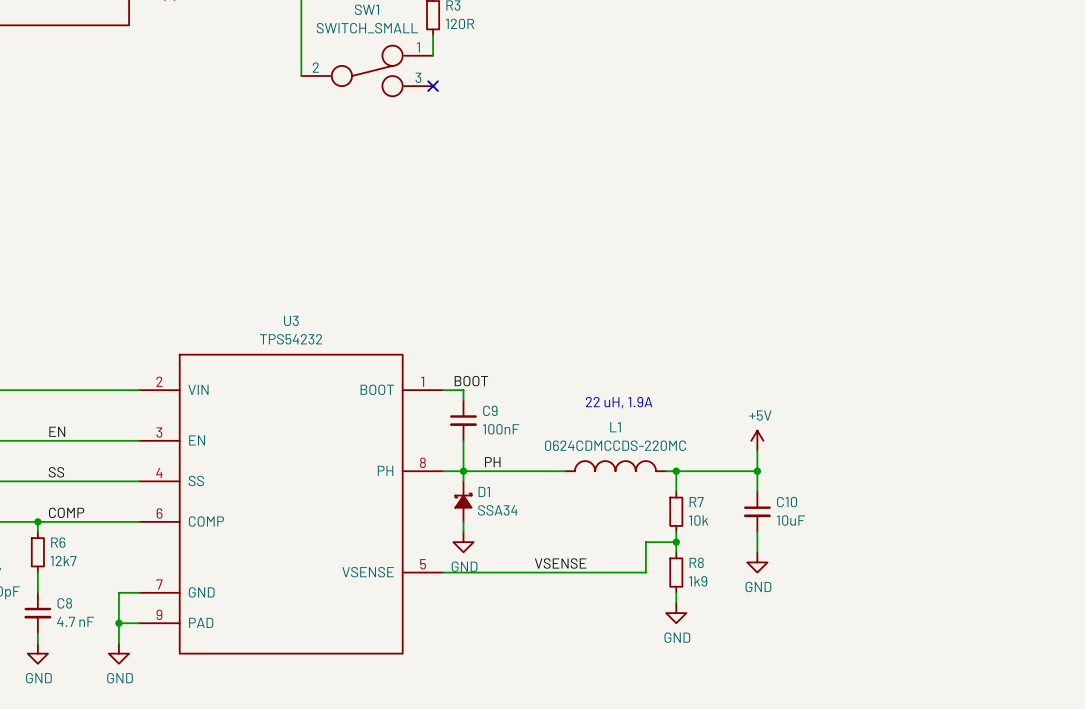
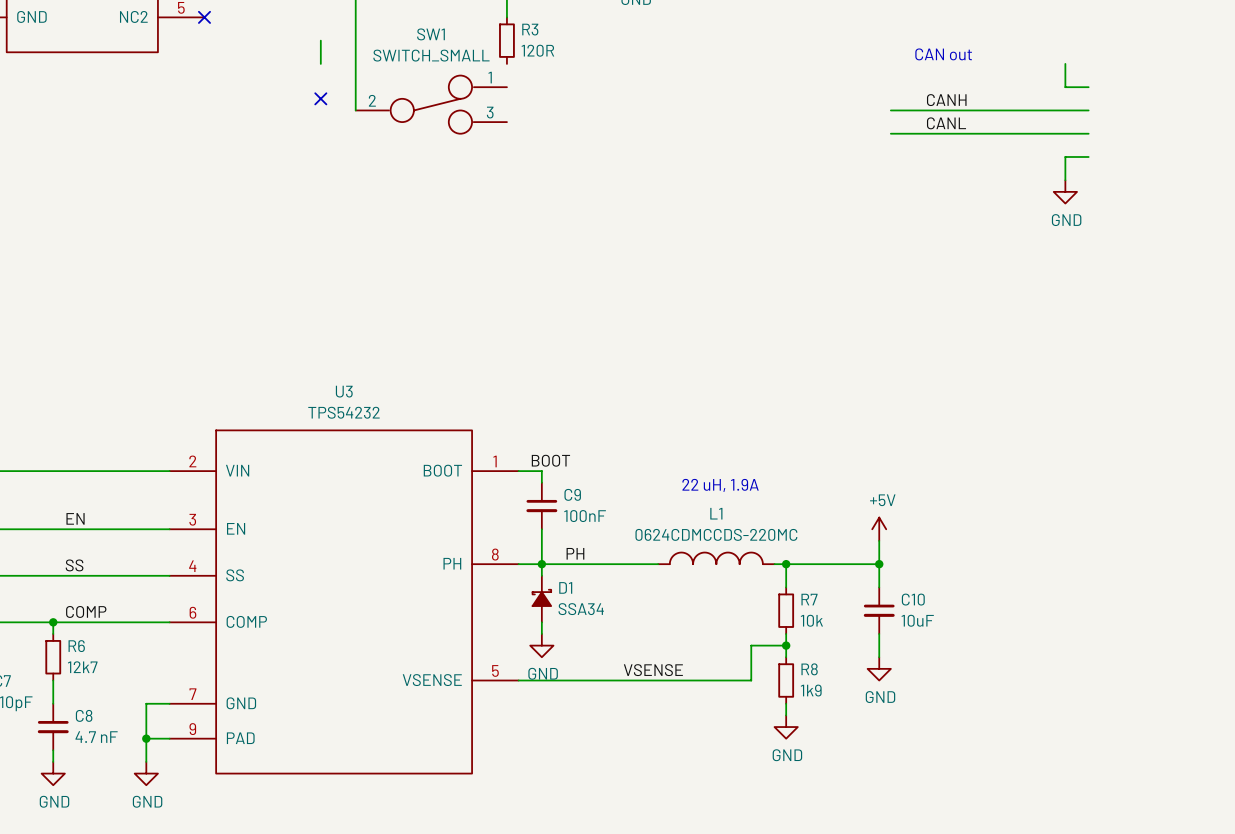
text: none -> CAN out (943, 54)
wire: (433, 35) (433, 55) -> (320, 40) (320, 63)
wire: none -> (1065, 63) (1065, 87) (1088, 87)
no-connect mark: none -> (320, 98)
label: none -> CANH (946, 100)
wire: none -> (890, 110) (1088, 110)
no-connect mark: (433, 86) -> none
label: none -> CANL (946, 123)
wire: none -> (890, 133) (1088, 133)
wire: none -> (1088, 156) (1065, 156) (1065, 180)
power symbol: none -> GND (1065, 191)

